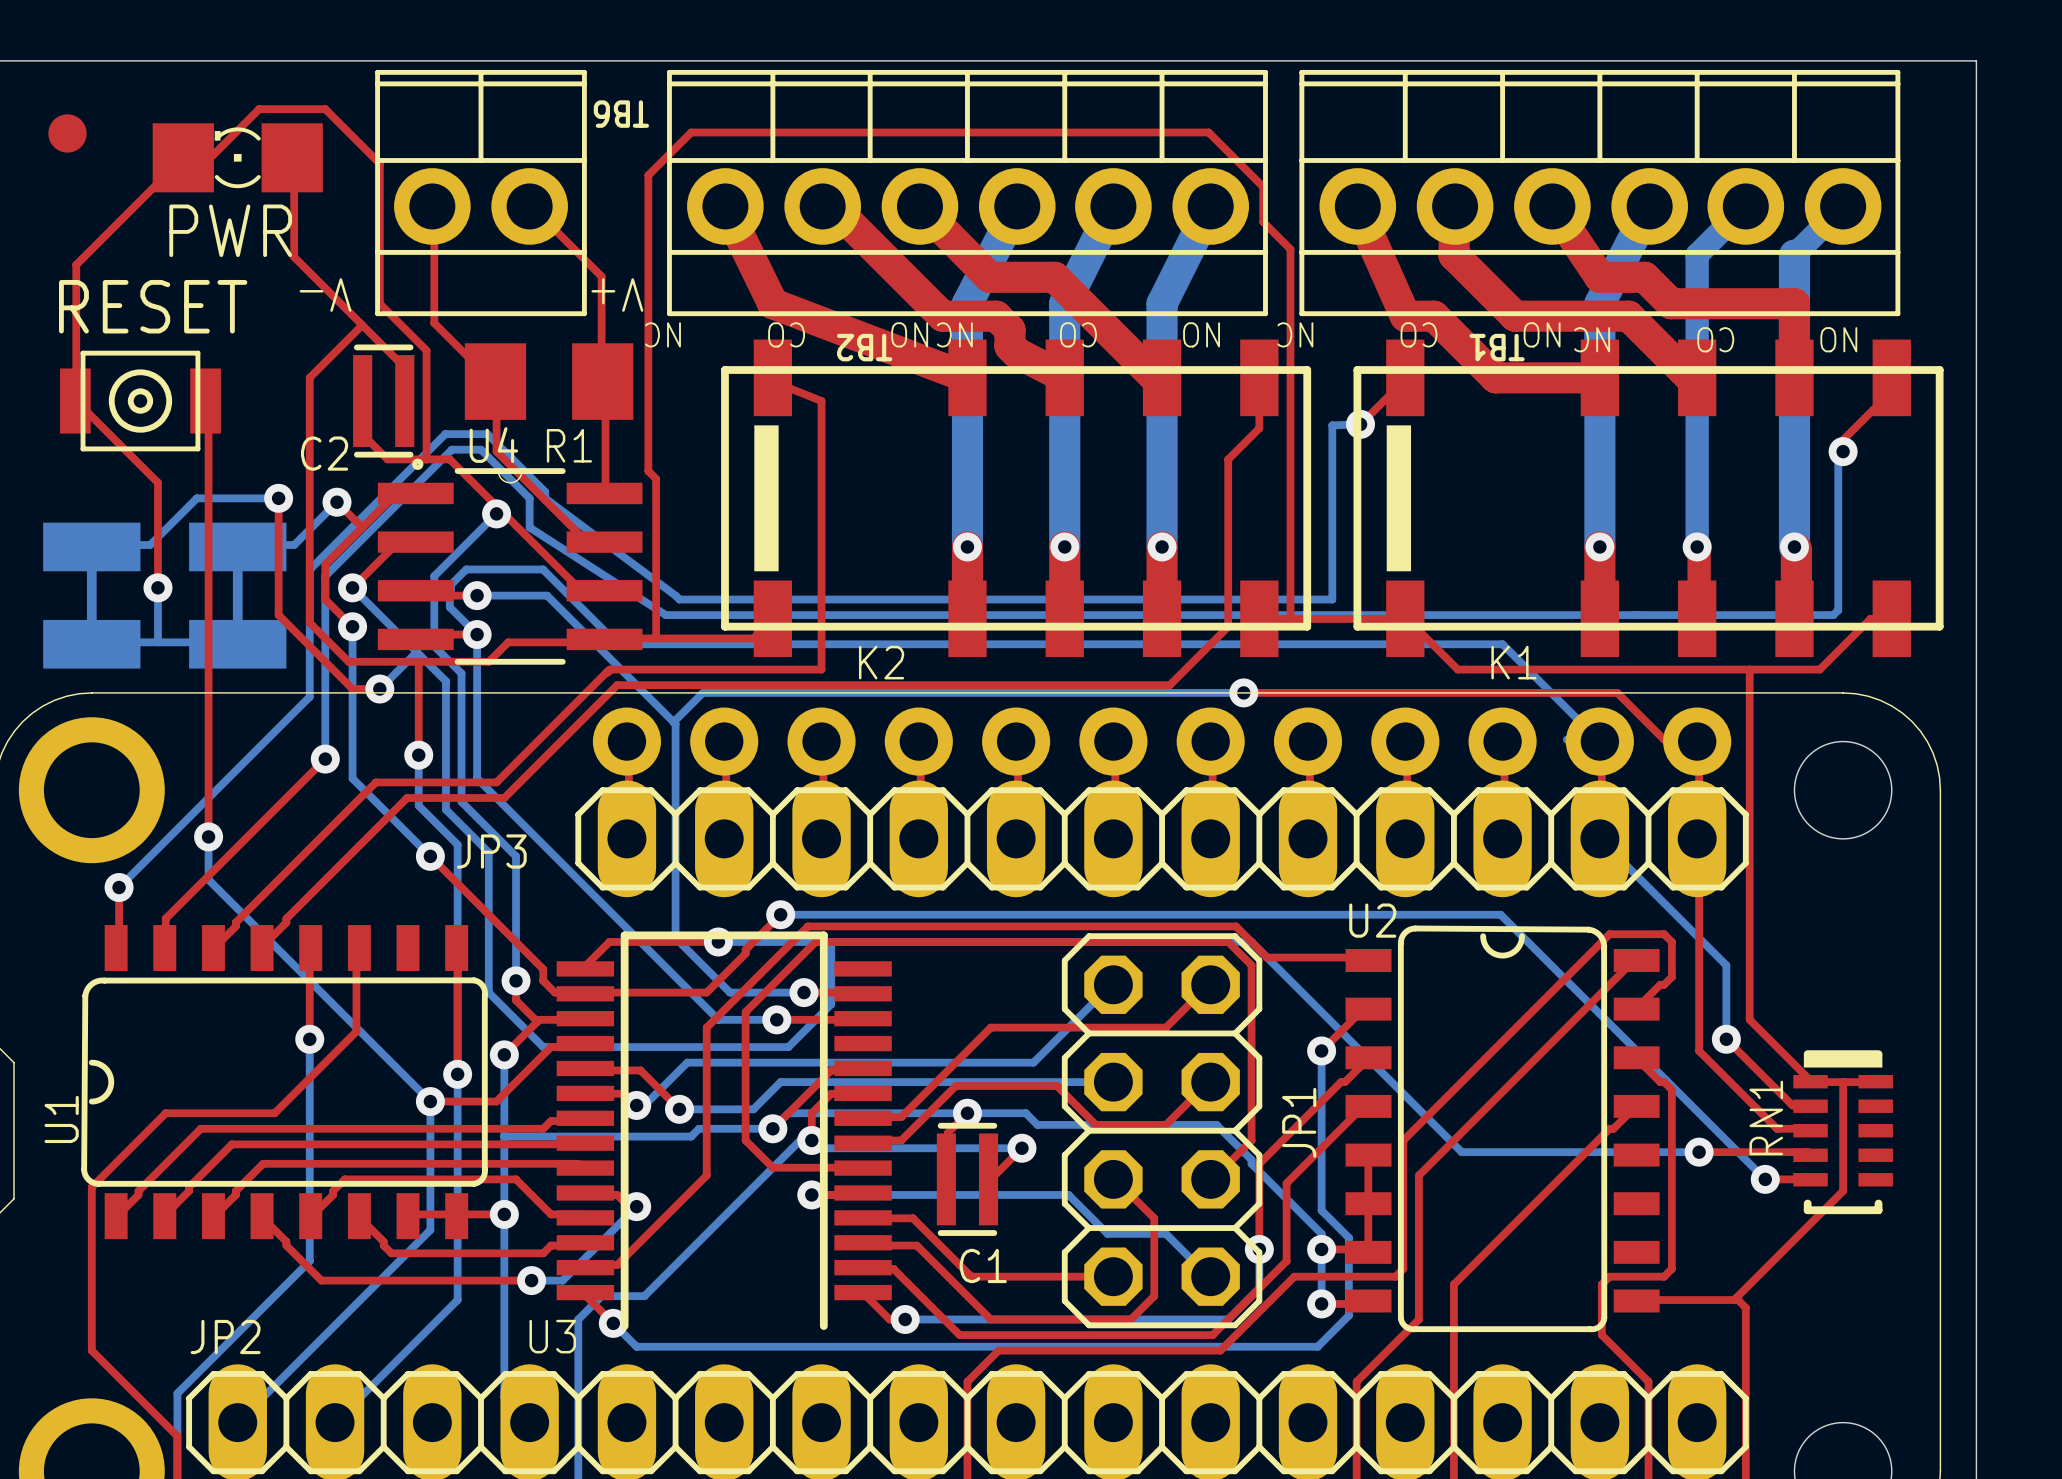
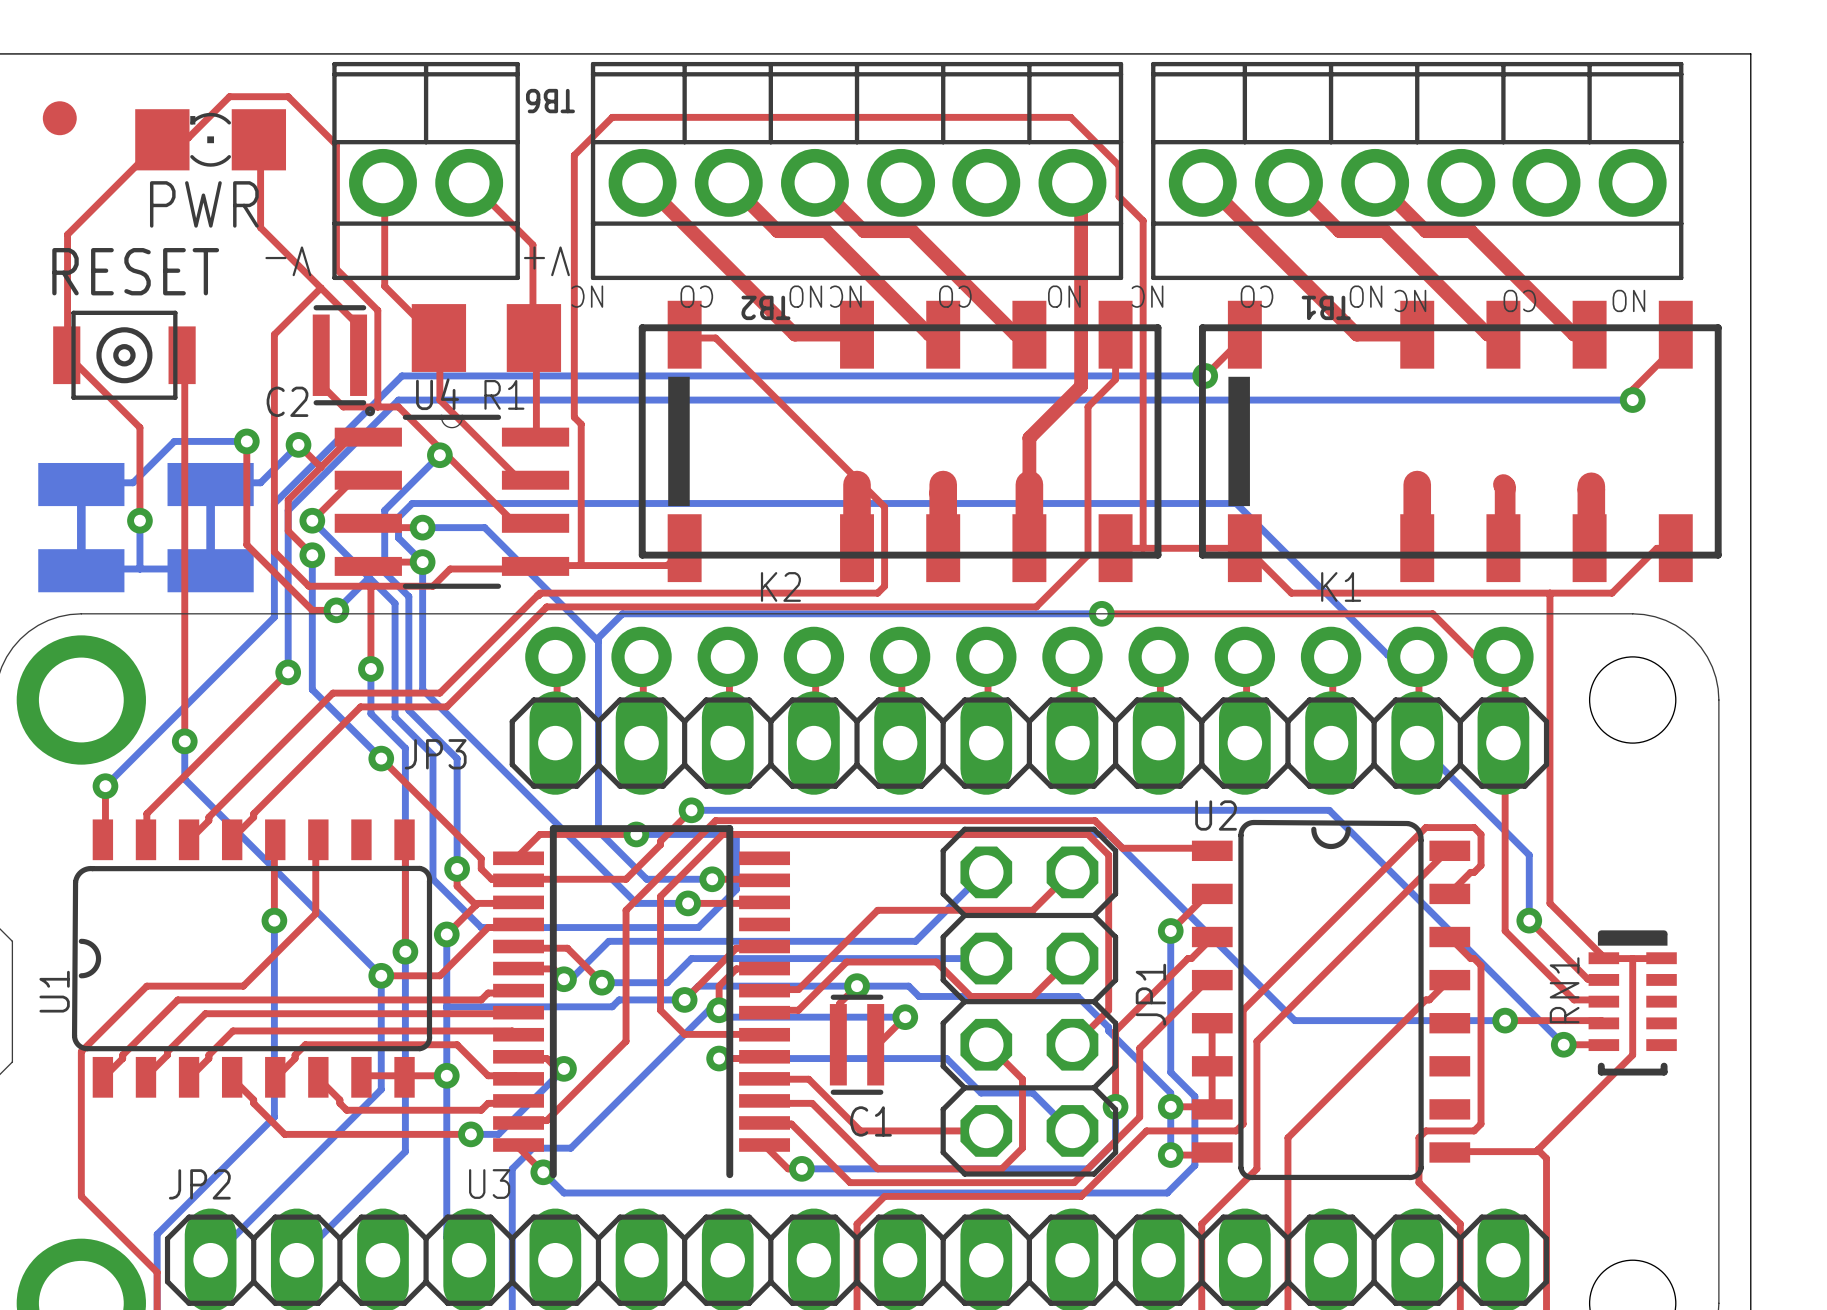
top track: (725, 206) (772, 303) (967, 377) -> (643, 182) (794, 334) (857, 334)
top track: (822, 206) (832, 206) (942, 316) (996, 316) (1009, 329) (1009, 346) (1016, 352) (1064, 377) -> (729, 182) (777, 231) (825, 231) (929, 334) (943, 334)
top track: (919, 206) (989, 277) (1054, 277) (1155, 377) -> (815, 182) (863, 231) (912, 231) (1015, 334) (1023, 334)
bottom track: (1017, 206) (967, 303) (967, 546) -> none
bottom track: (1113, 206) (1064, 303) (1064, 546) -> none
bottom track: (1210, 206) (1162, 303) (1162, 546) -> none
top track: (1357, 206) (1405, 316) (1434, 316) (1495, 377) (1599, 377) -> none
top track: none -> (1205, 182) (1356, 334) (1415, 334)
top track: (1455, 206) (1453, 255) (1515, 316) (1628, 316) (1690, 377) (1697, 377) -> (1291, 182) (1339, 231) (1384, 231) (1487, 334) (1503, 334)
top track: (1552, 206) (1599, 277) (1644, 277) (1671, 303) (1794, 303) (1794, 377) -> (1375, 182) (1377, 182) (1425, 231) (1470, 231) (1574, 334) (1589, 334)
bottom track: (1649, 206) (1599, 303) (1599, 546) -> none
bottom track: (1745, 206) (1697, 255) (1697, 546) -> none
bottom track: (1843, 206) (1794, 255) (1794, 546) -> none
top track: none -> (1081, 189) (1081, 386) (1029, 437) (1029, 484)
top track: (772, 381) (821, 401) (821, 669) -> (684, 338) (715, 338) (884, 506) (884, 586) (877, 593) (727, 593)
bottom track: (1360, 424) (1332, 425) (1332, 599) (679, 599) (545, 498) (545, 491) (487, 434) (445, 434) (309, 568) -> (1205, 375) (401, 375) (274, 503)
bottom track: (449, 451) (451, 449) (480, 449) (529, 498) (529, 527) (665, 615) (1833, 615) (1838, 610) (1838, 456) (1843, 451) -> (398, 400) (1632, 400)
via: (967, 546) -> none
via: (1064, 546) -> none
via: (1162, 546) -> none
via: (1599, 546) -> none
via: (1697, 546) -> none
via: (1794, 546) -> none
bottom track: none -> (398, 517) (412, 503) (1236, 503) (1387, 655)
bottom track: (449, 595) (450, 584) (466, 569) (543, 569) (617, 644) (1502, 644) (1597, 739) -> none

